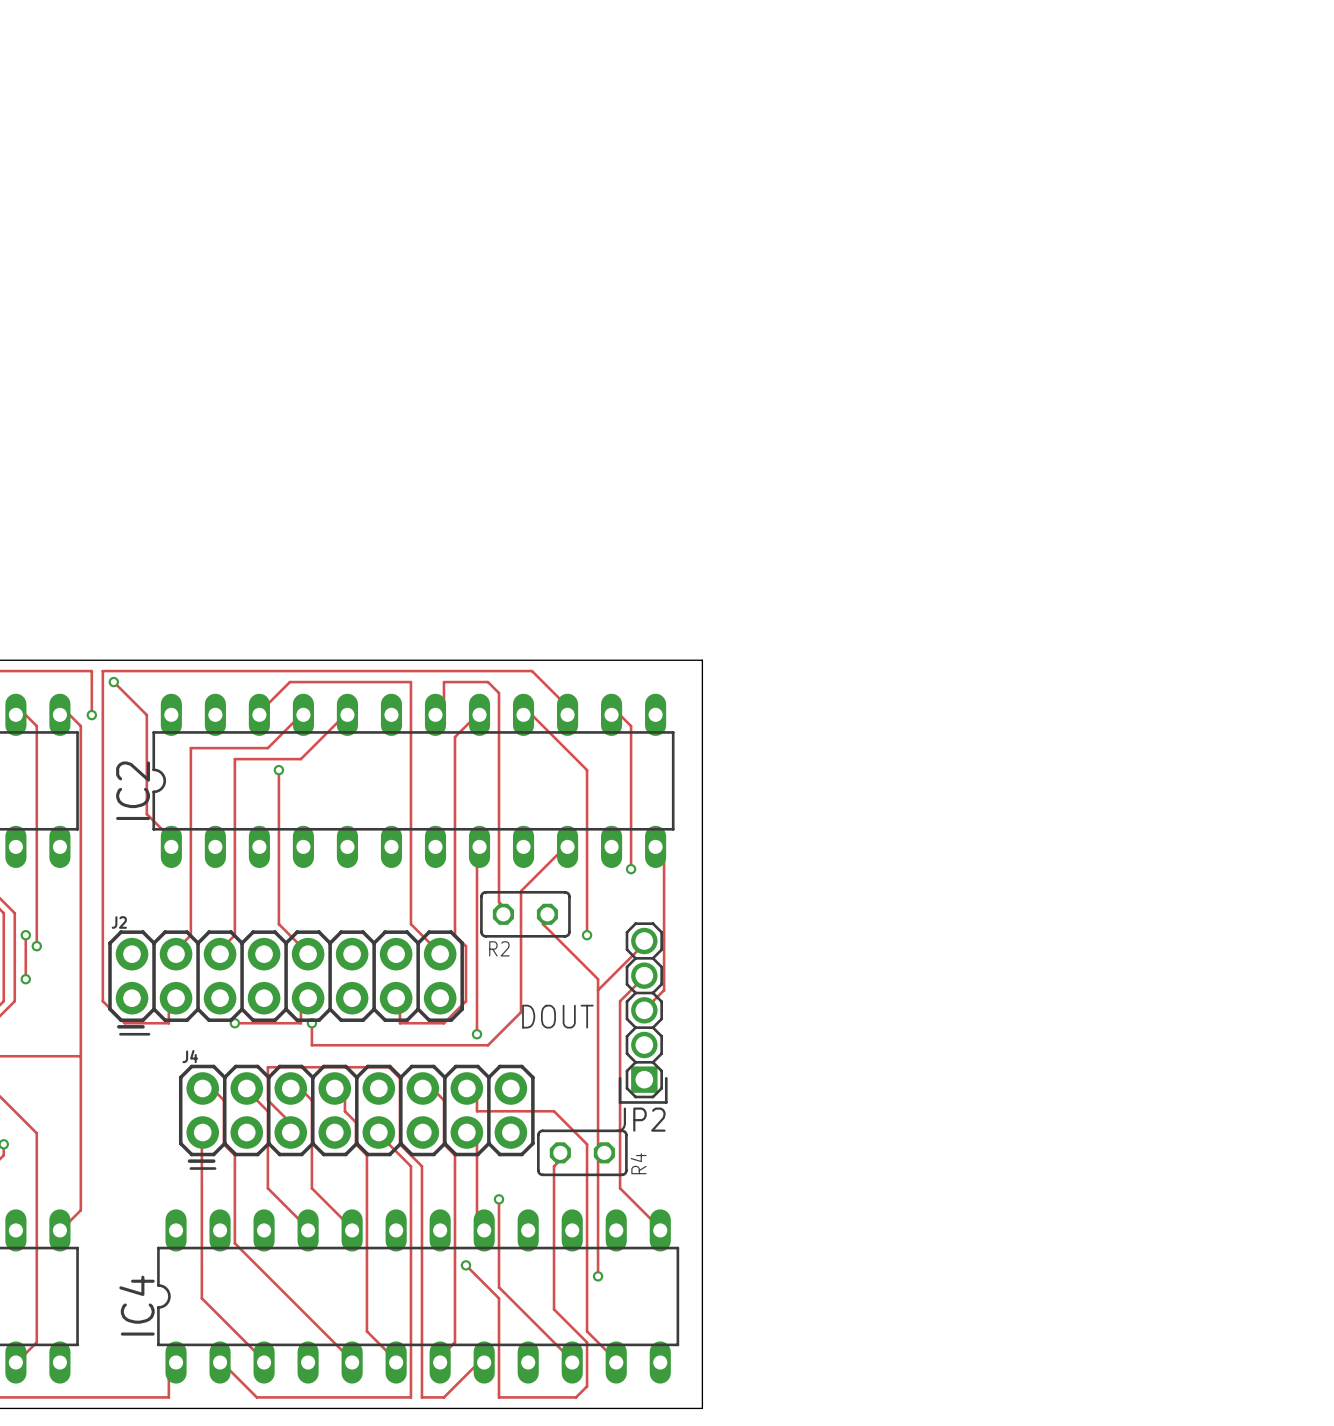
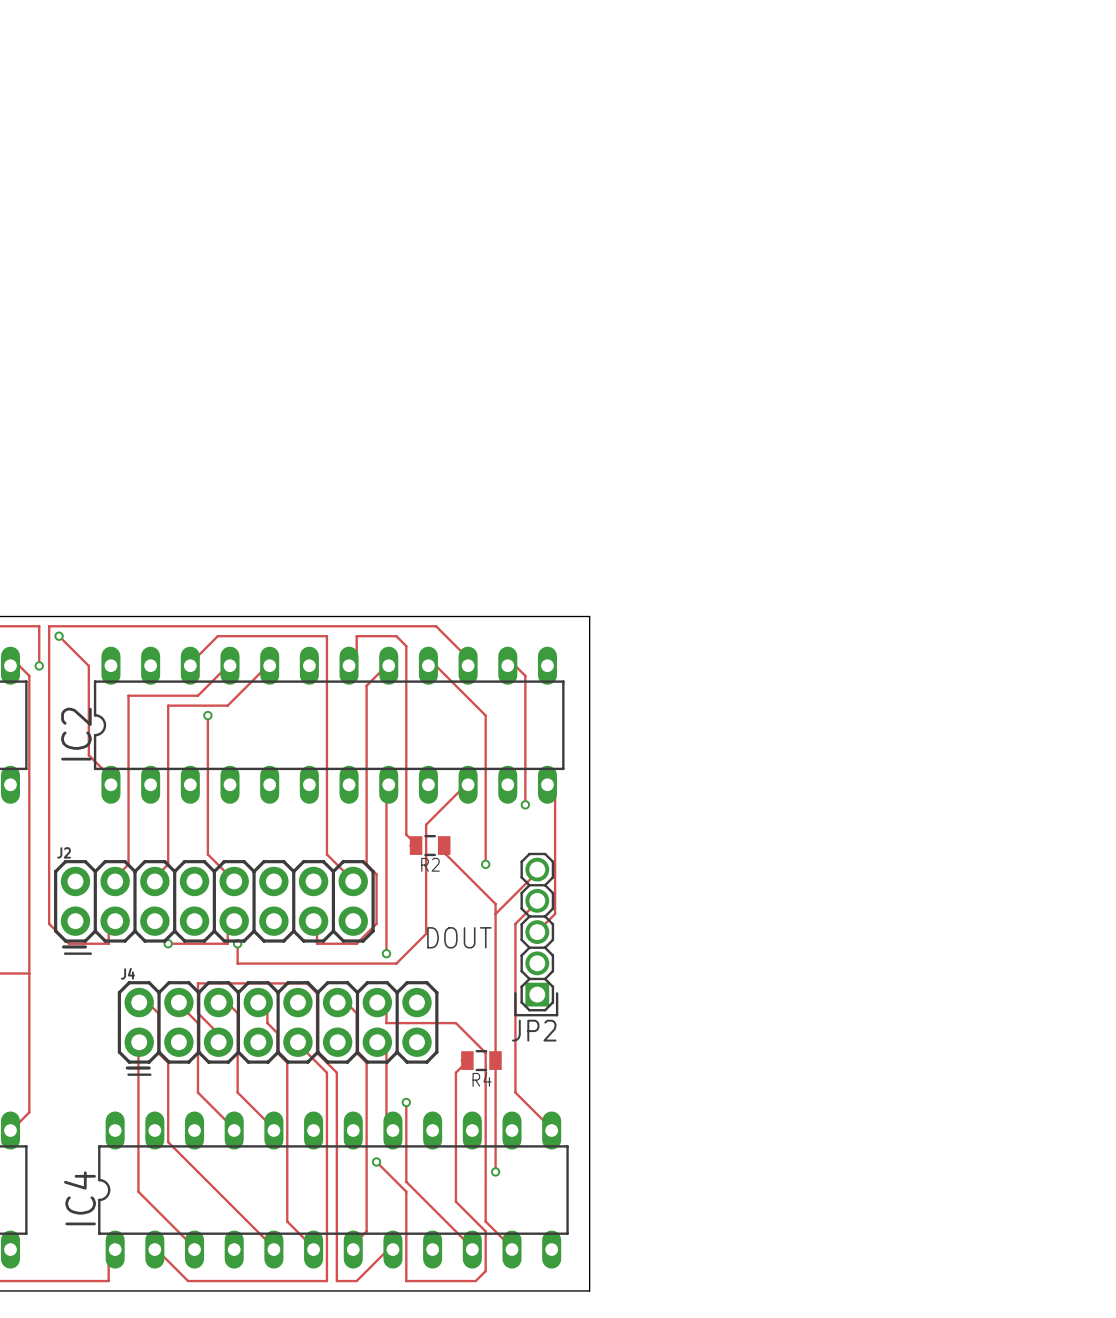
R2 footprint: [480, 890, 571, 938] -> [409, 834, 451, 857]
R4 footprint: [537, 1129, 628, 1177] -> [461, 1050, 502, 1072]
R4 name position: R4 (638, 1163) -> R4 (482, 1079)

